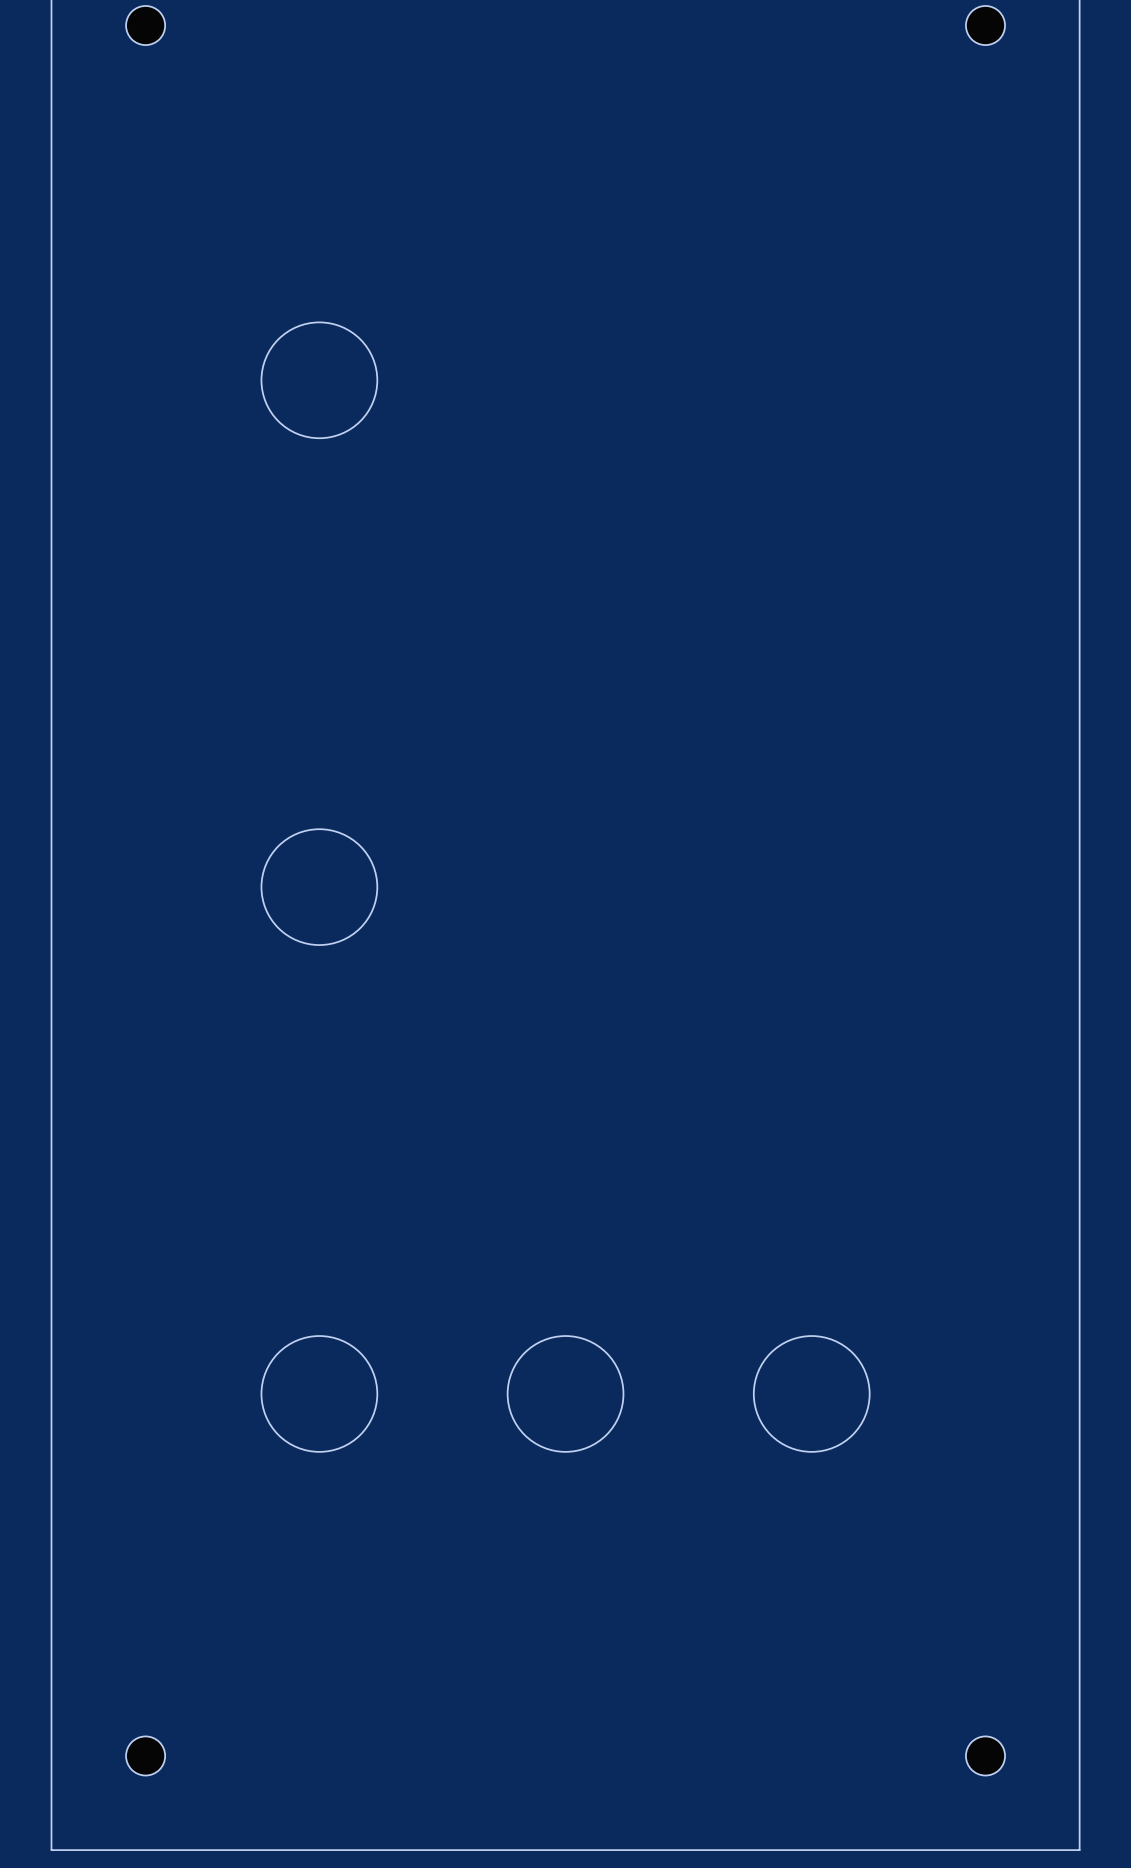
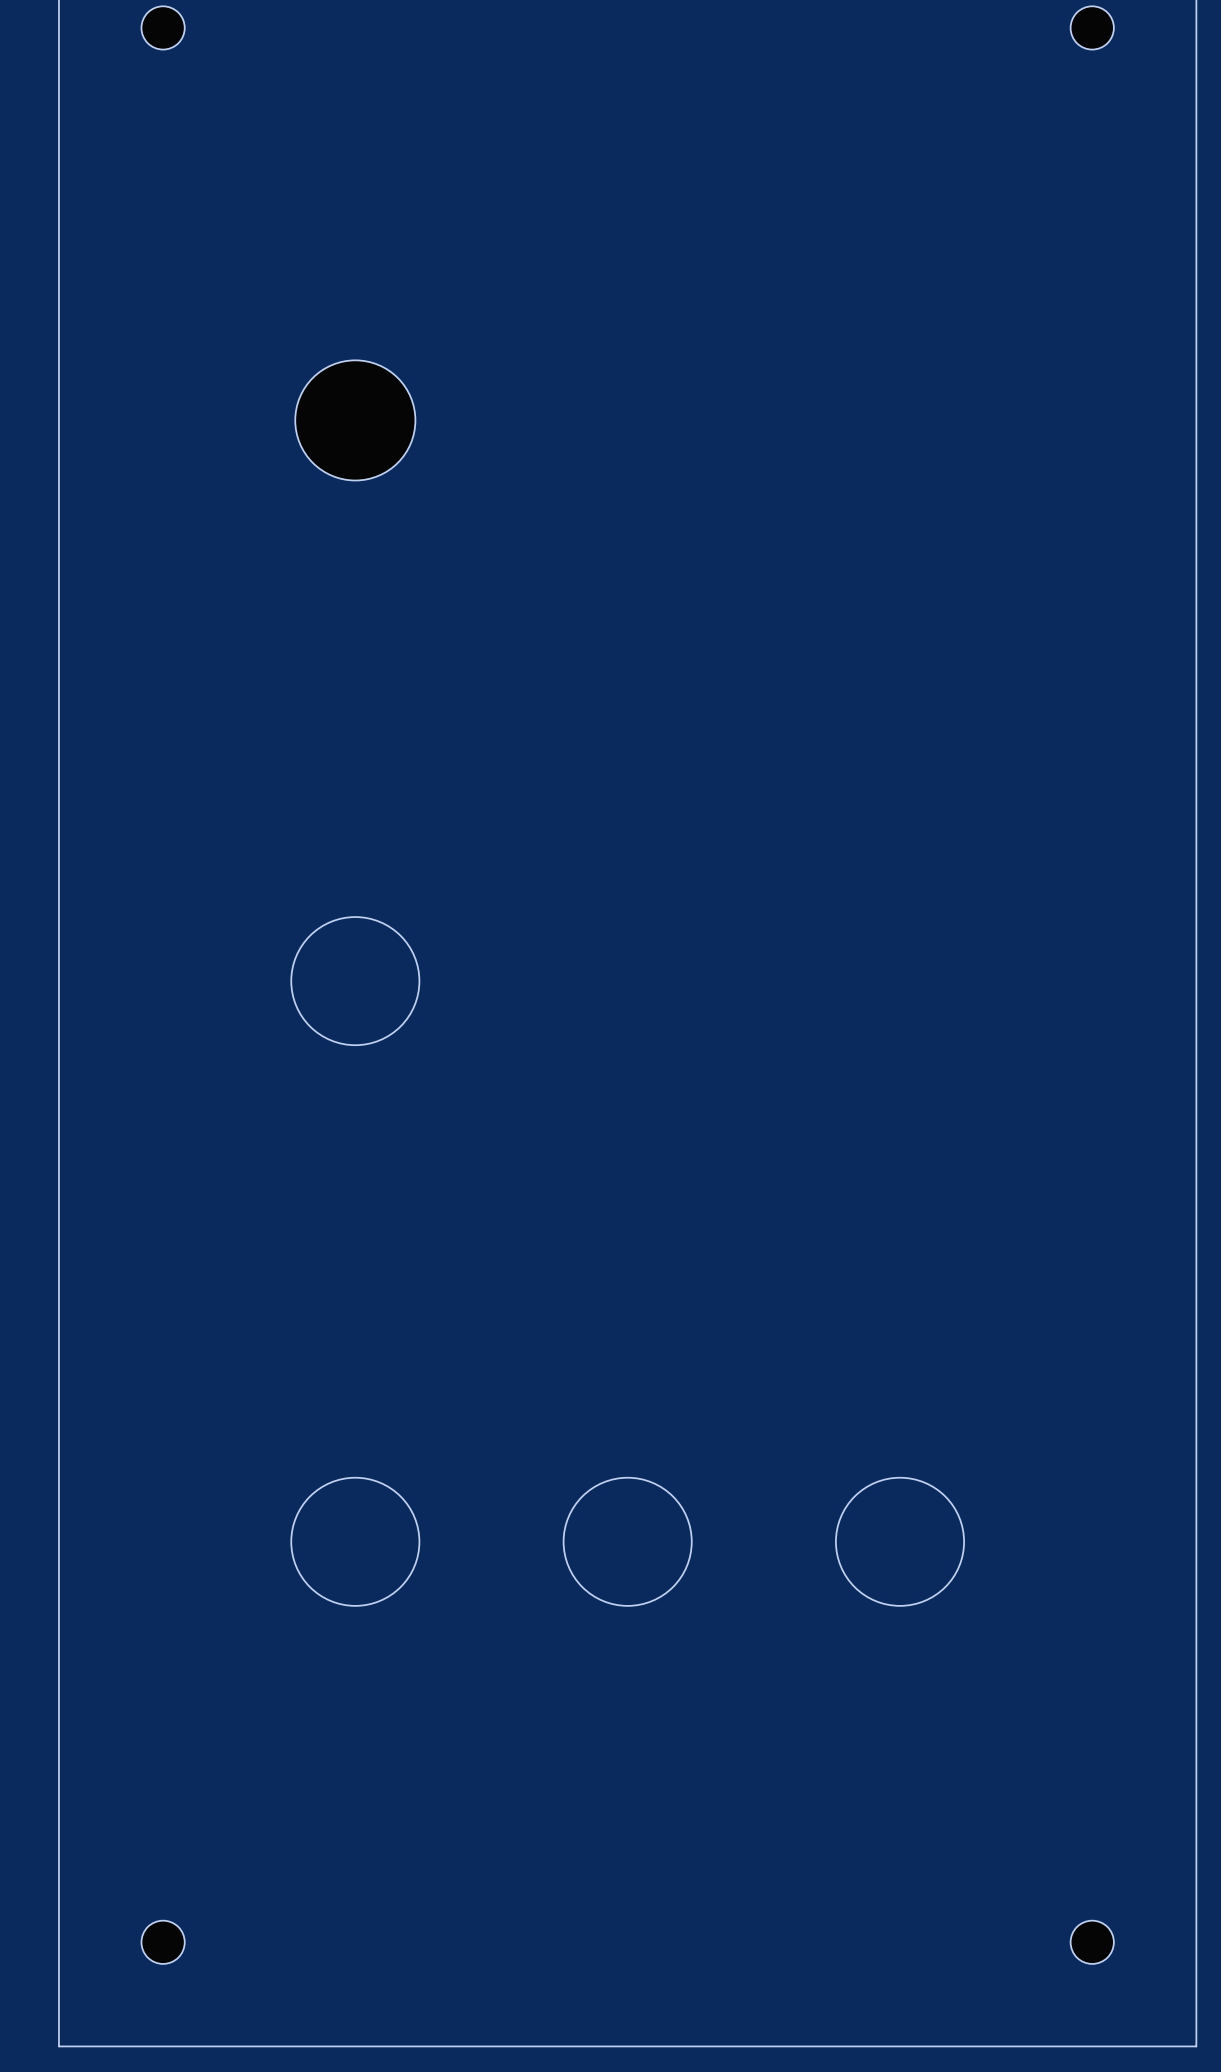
round board edge: [261, 322, 378, 439] -> none
part: none -> (355, 420)

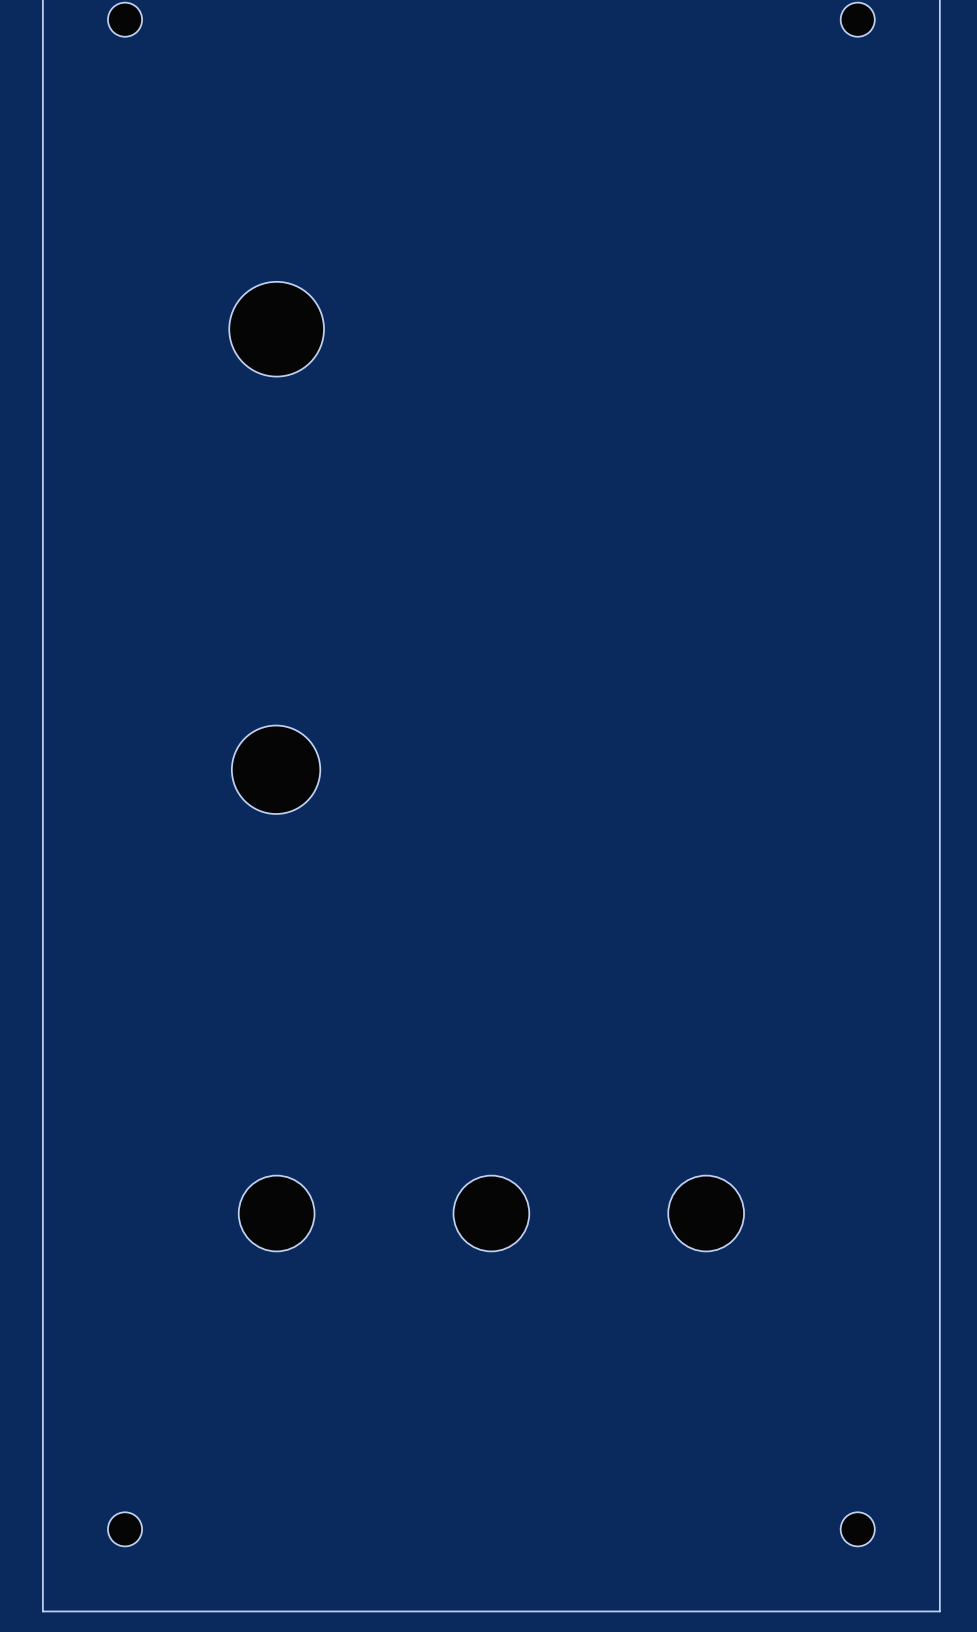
round board edge: [290, 916, 420, 1046] -> none
part: none -> (276, 769)
round board edge: [290, 1477, 420, 1607] -> none
round board edge: [563, 1477, 693, 1607] -> none
round board edge: [835, 1477, 965, 1607] -> none
part: none -> (276, 1213)
part: none -> (491, 1213)
part: none -> (706, 1213)

